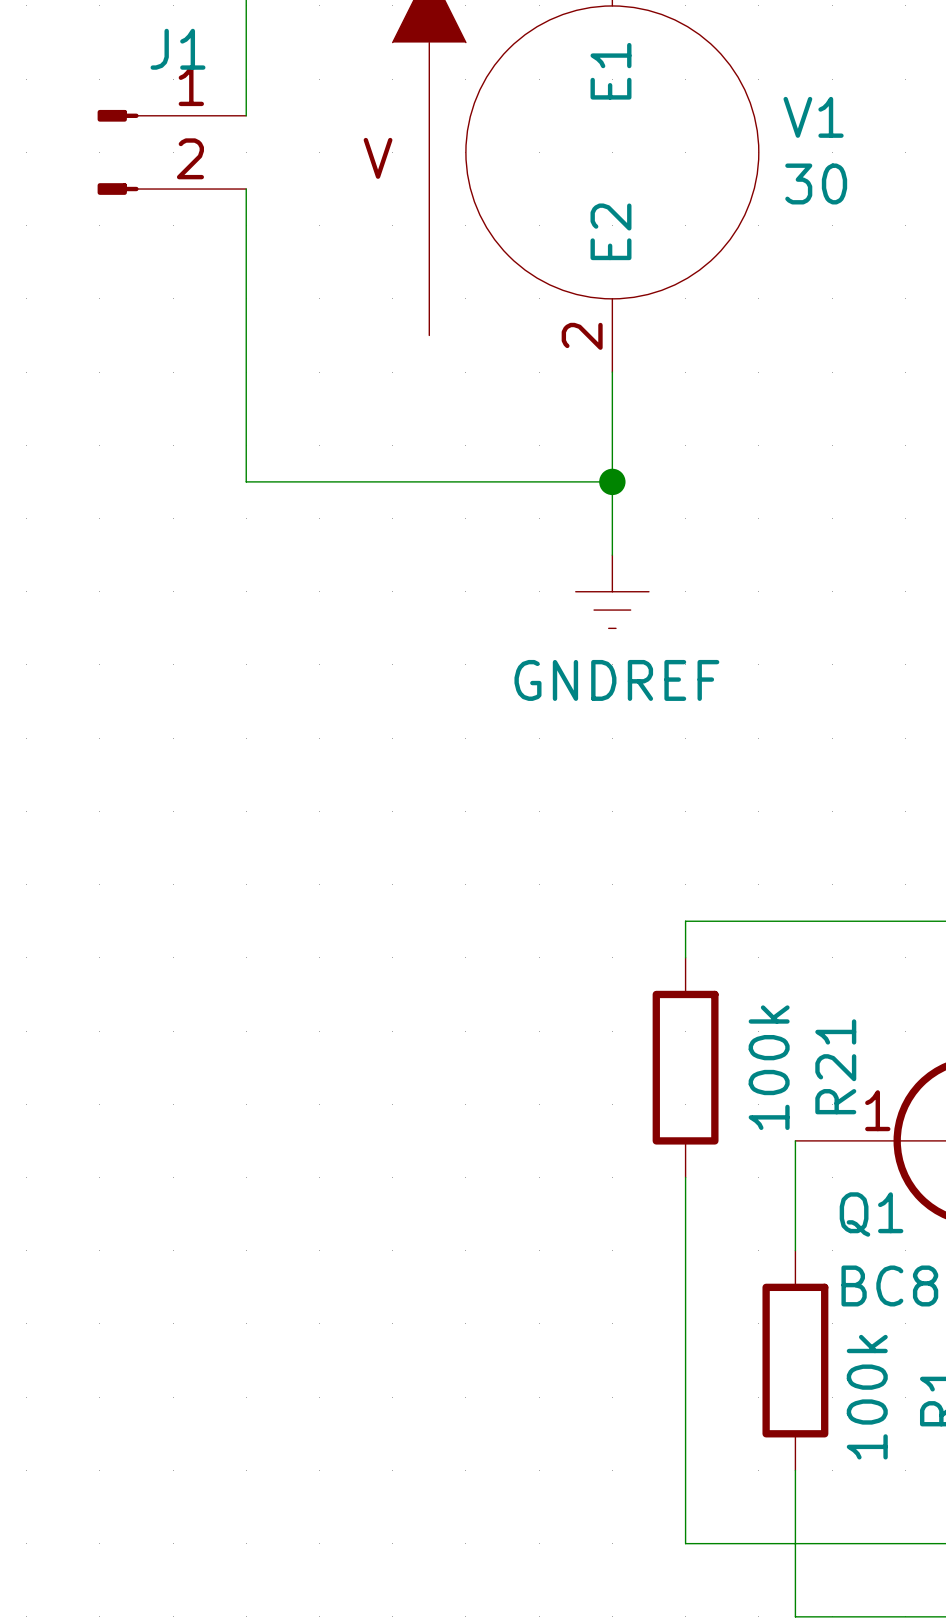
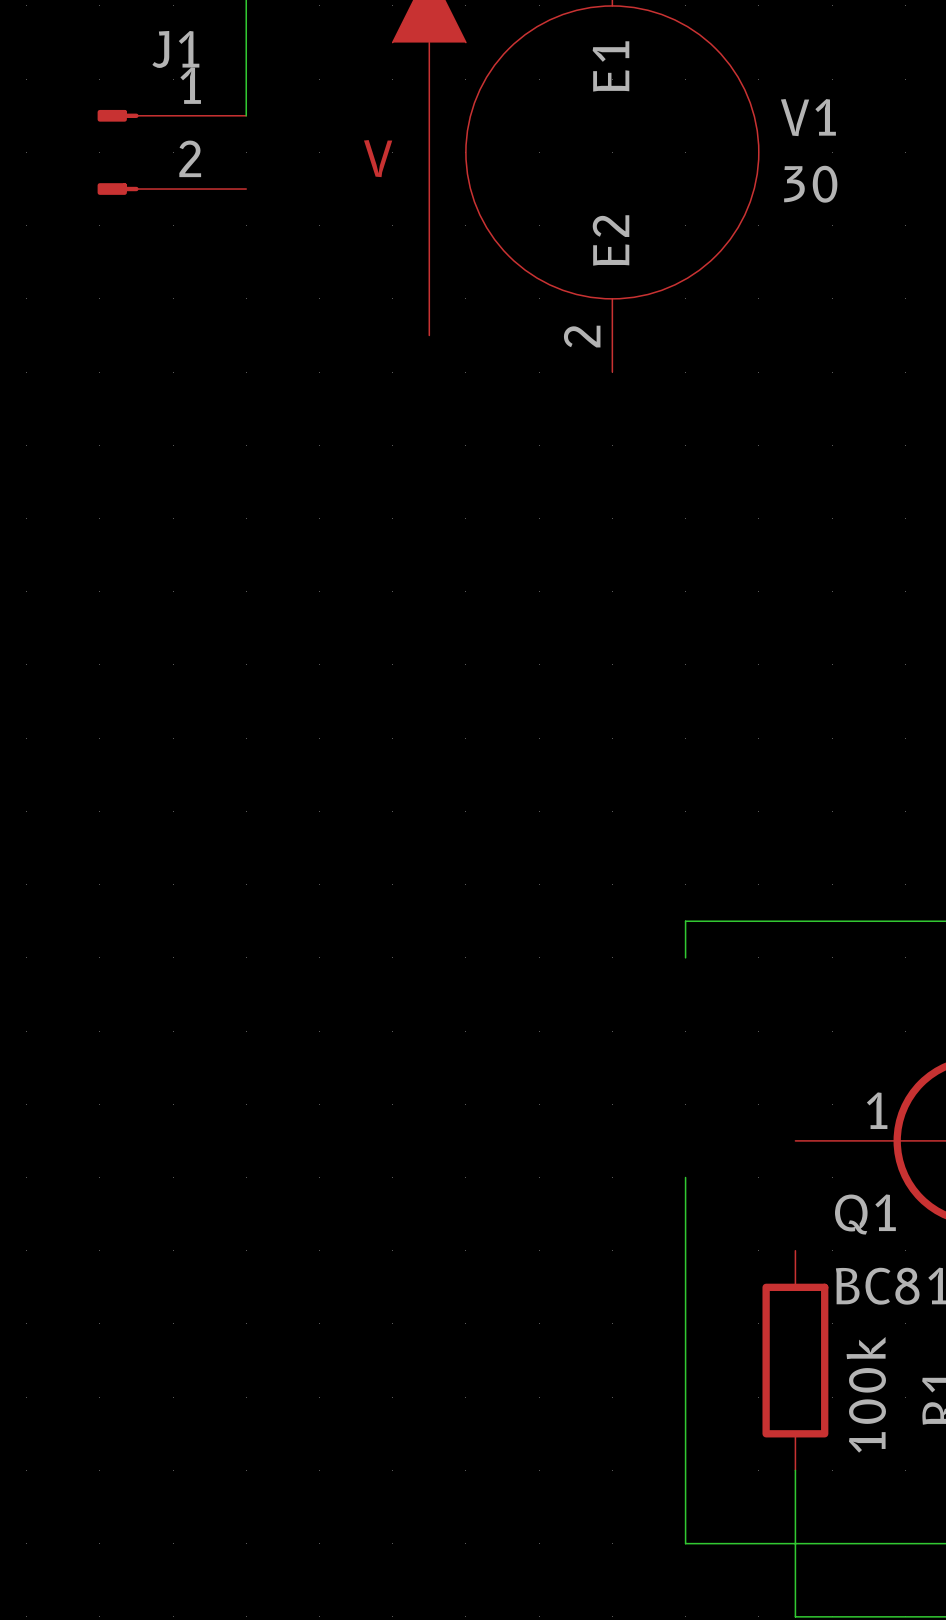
wire: (246, 189) (246, 481) (612, 481) -> none
wire: (612, 372) (612, 555) -> none
junction: (612, 481) -> none
power symbol: GNDREF (612, 591) -> none
R21: 100k (685, 1067) -> none
wire: (795, 1140) (795, 1250) -> none

